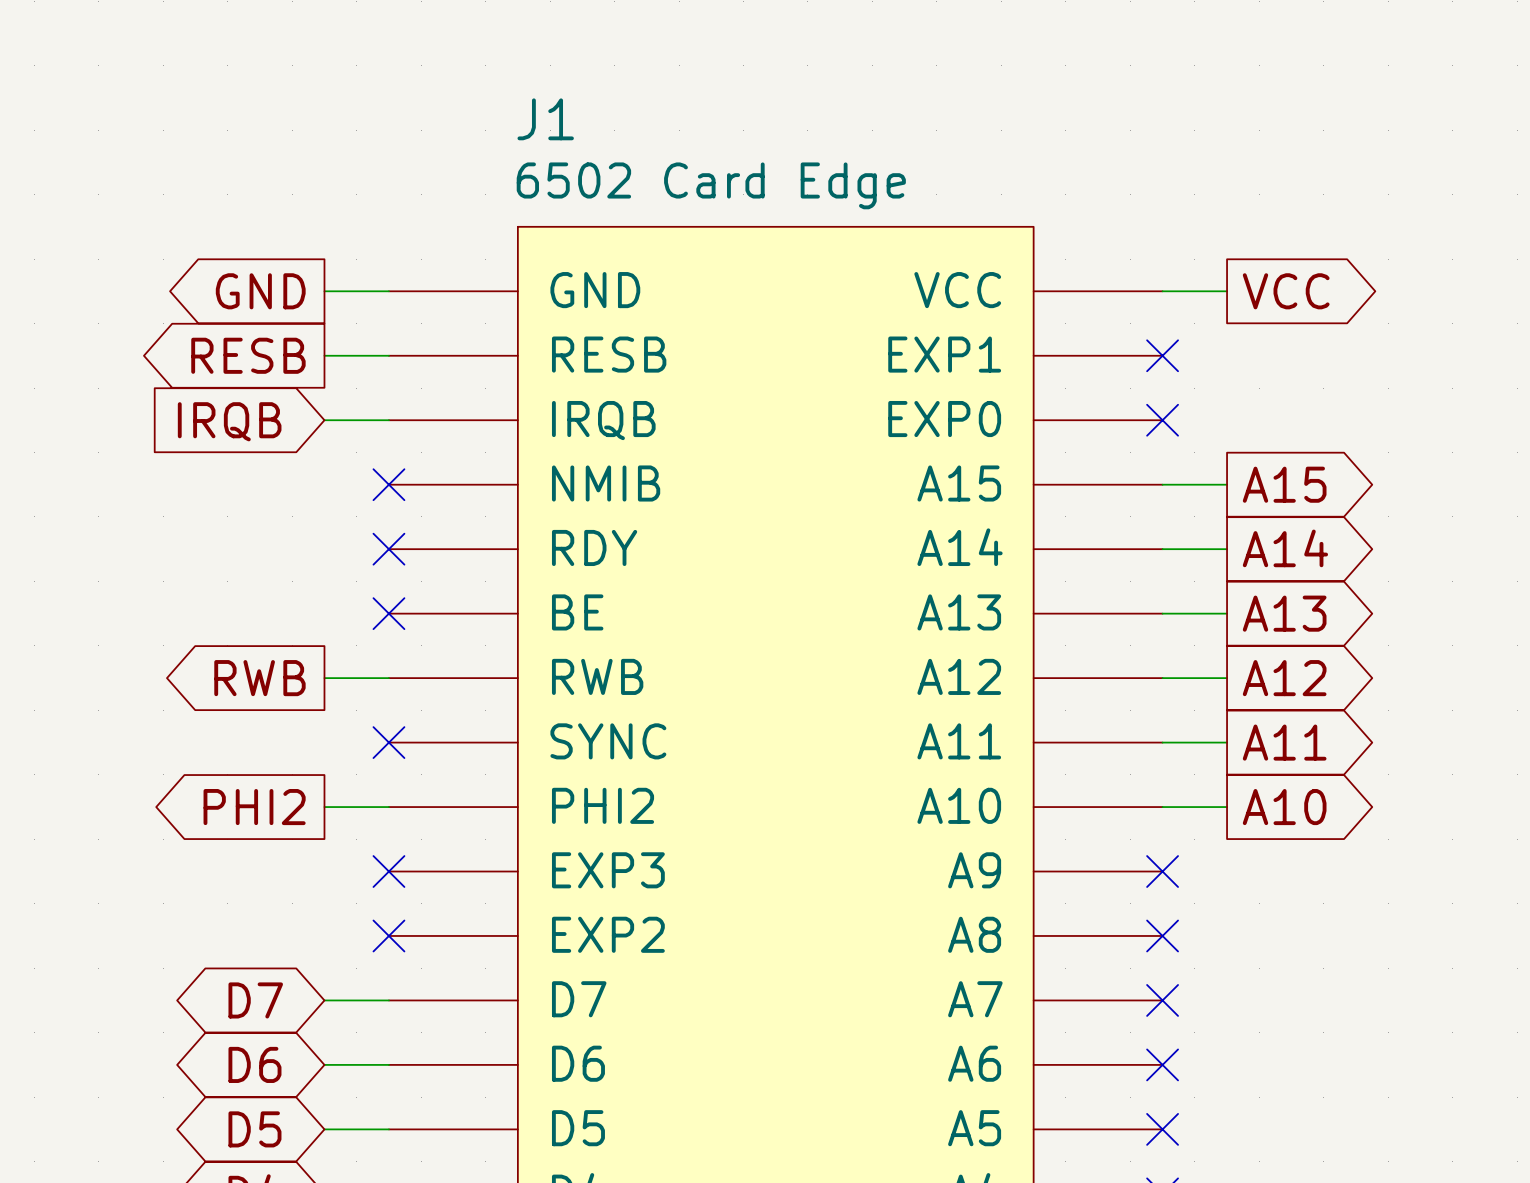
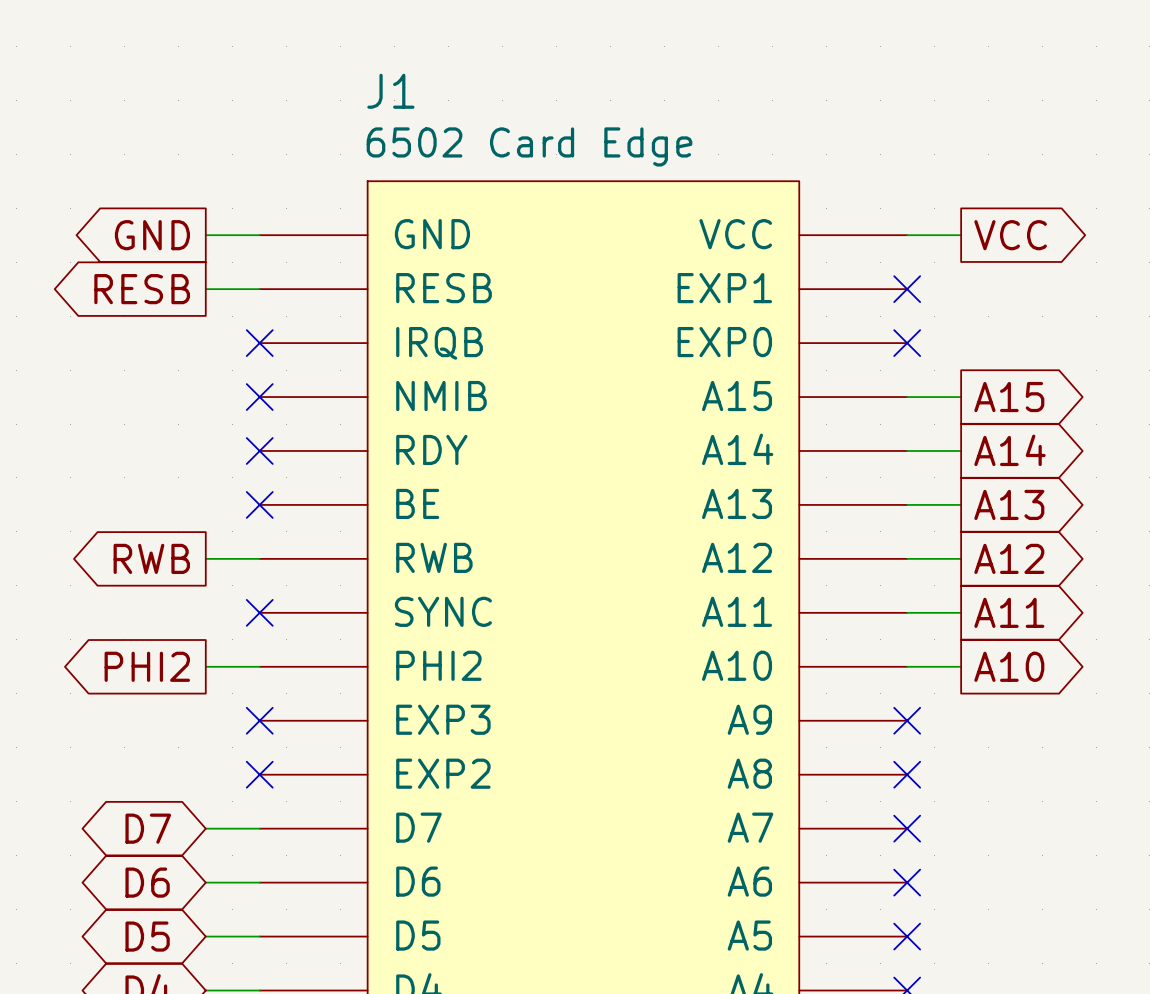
wire: (324, 420) (388, 420) -> none
no-connect mark: none -> (259, 343)
global label: IRQB (229, 421) -> none

